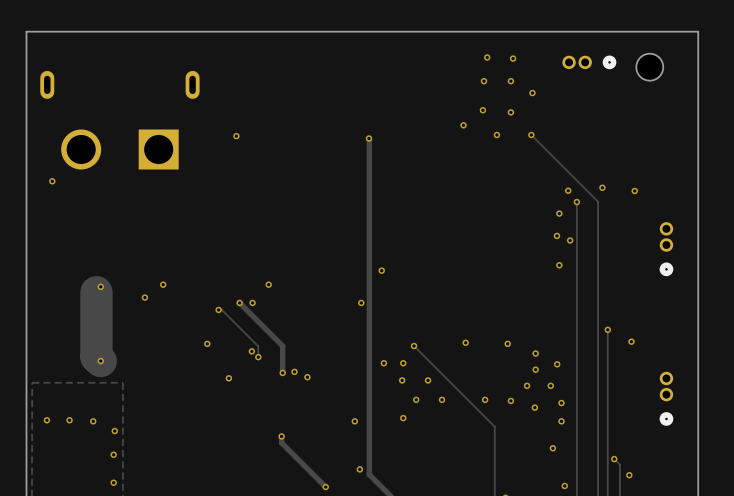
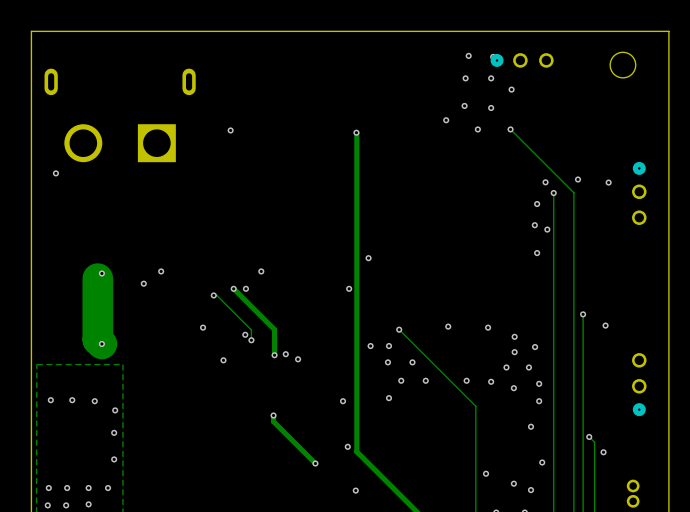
part: none -> (522, 60)
part: (589, 62) -> none
part: none -> (639, 193)
part: (666, 249) -> none
part footprint: [659, 371, 674, 426] -> [632, 353, 647, 417]

